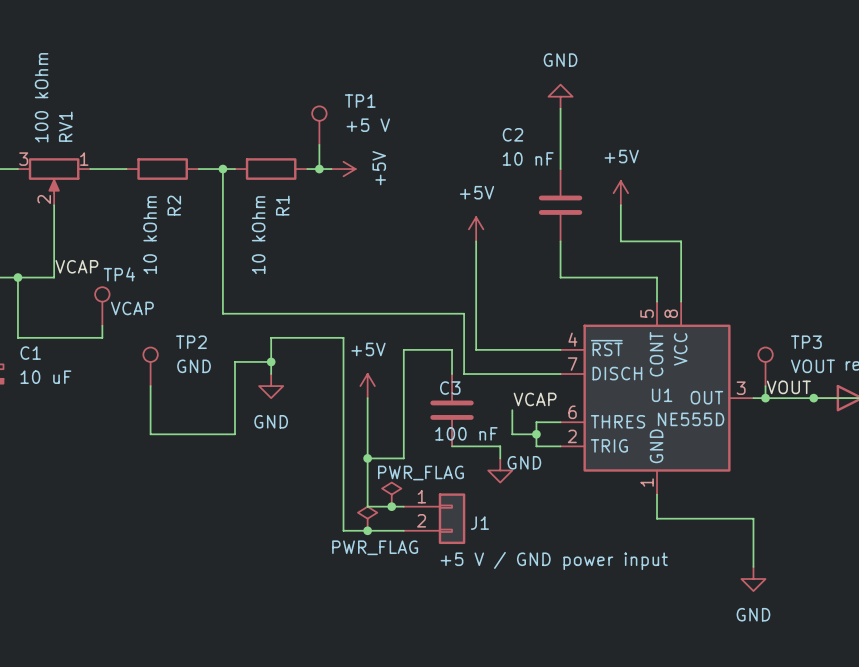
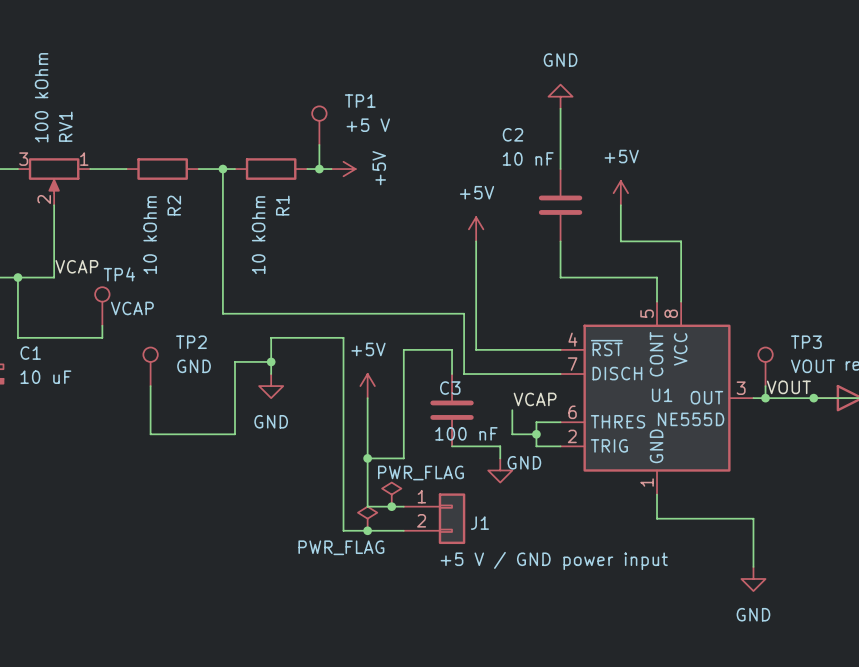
power symbol text position: PWR_FLAG (375, 547) -> PWR_FLAG (341, 547)

